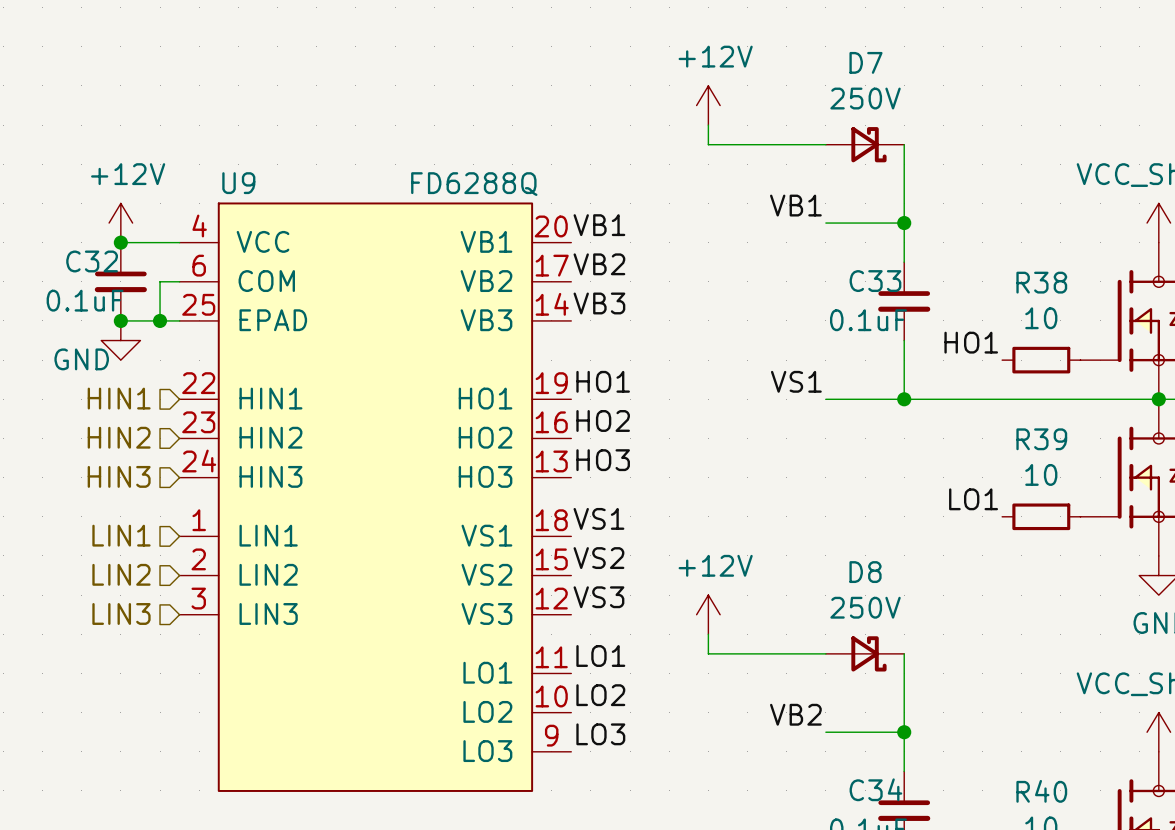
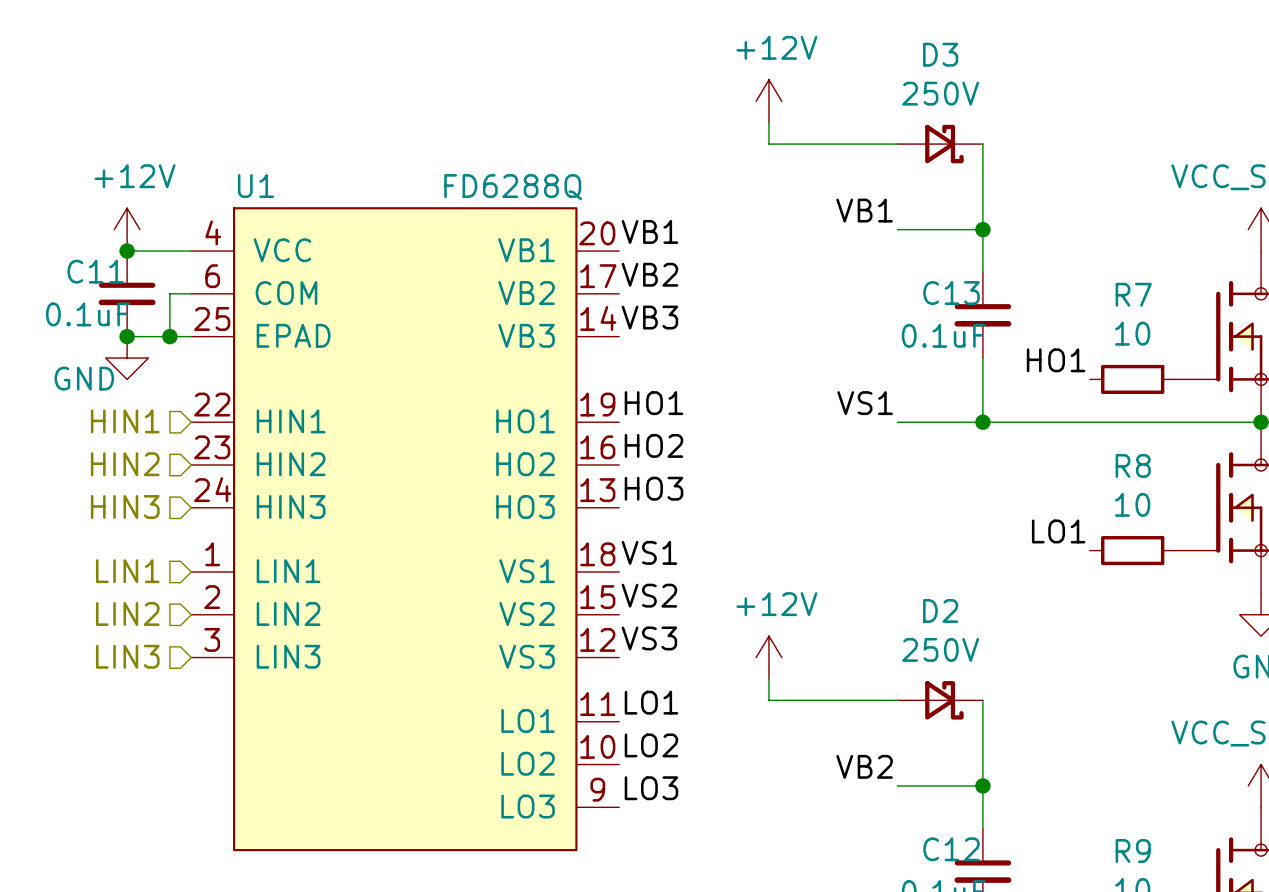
D7 name: D7 (865, 62) -> D3 (940, 54)
U9 name: U9 (238, 183) -> U1 (255, 186)
C32 name: C32 (92, 261) -> C11 (95, 271)
C33 name: C33 (875, 281) -> C13 (951, 293)
R38 name: R38 (1041, 282) -> R7 (1133, 294)
R39 name: R39 (1041, 439) -> R8 (1133, 465)
D8 name: D8 (865, 572) -> D2 (940, 610)
C34 name: C34 (875, 789) -> C12 (951, 849)
R40 name: R40 (1041, 791) -> R9 (1133, 851)

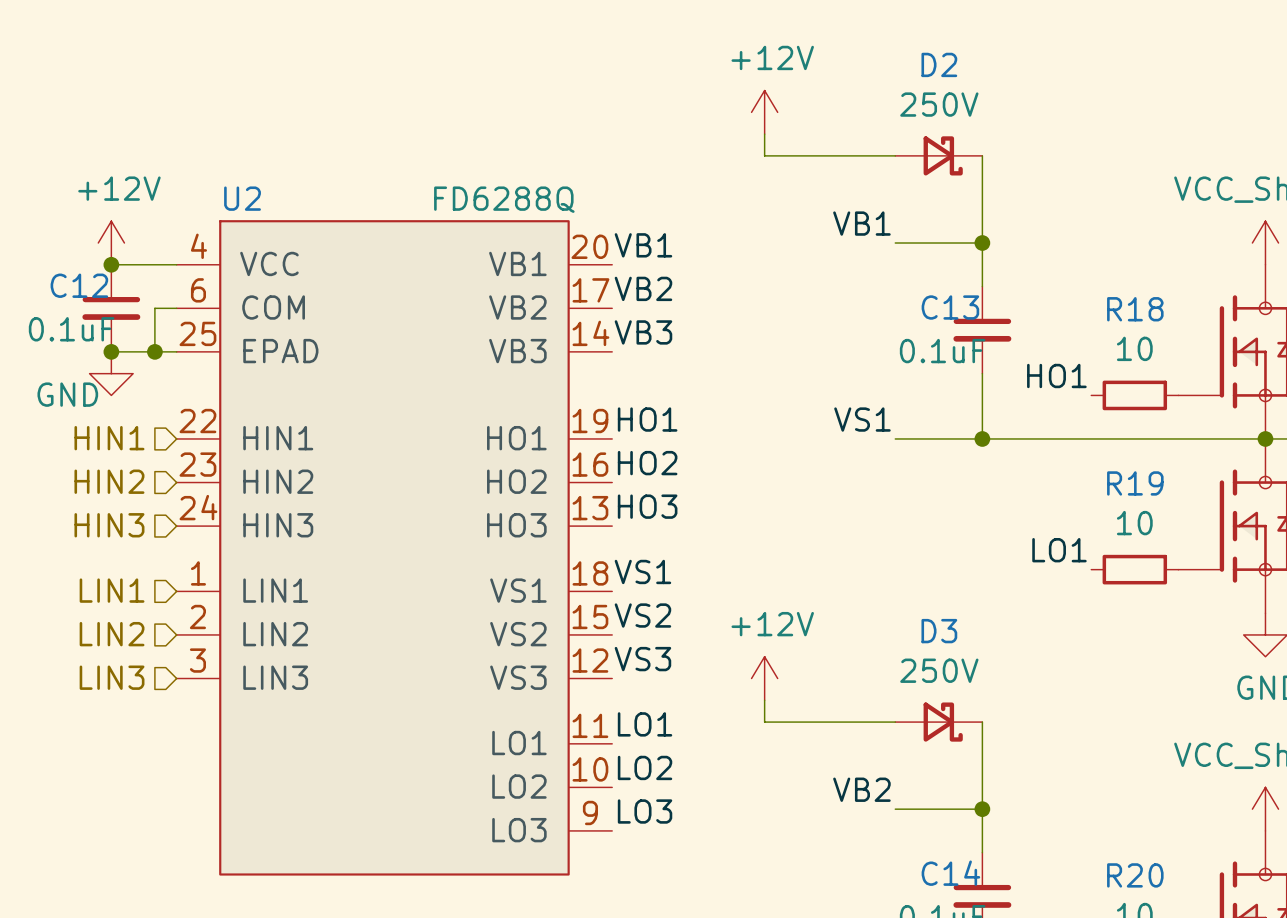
D3 name: D3 (940, 54) -> D2 (939, 64)
U1 name: U1 (255, 186) -> U2 (242, 198)
C11 name: C11 (95, 271) -> C12 (79, 285)
R7 name: R7 (1133, 294) -> R18 (1135, 309)
R8 name: R8 (1133, 465) -> R19 (1135, 483)
D2 name: D2 (940, 610) -> D3 (939, 631)
C12 name: C12 (951, 849) -> C14 (950, 873)
R9 name: R9 (1133, 851) -> R20 (1135, 875)

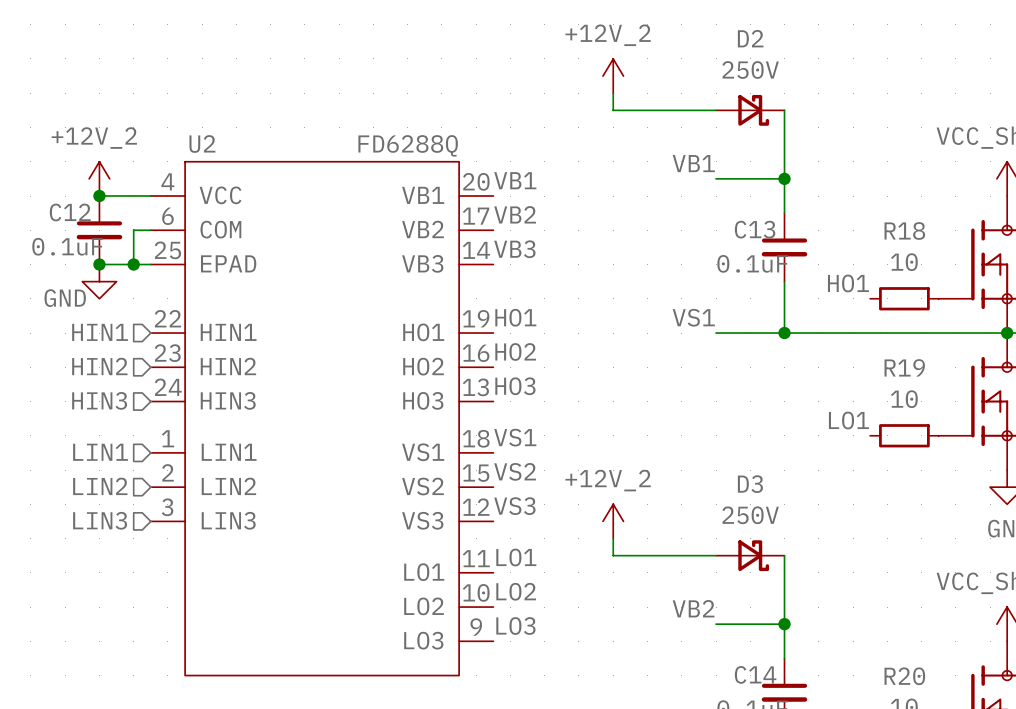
power symbol: +12V (764, 112) -> +12V_2 (613, 76)
power symbol: +12V (111, 243) -> +12V_2 (99, 178)
power symbol: +12V (764, 678) -> +12V_2 (613, 521)

